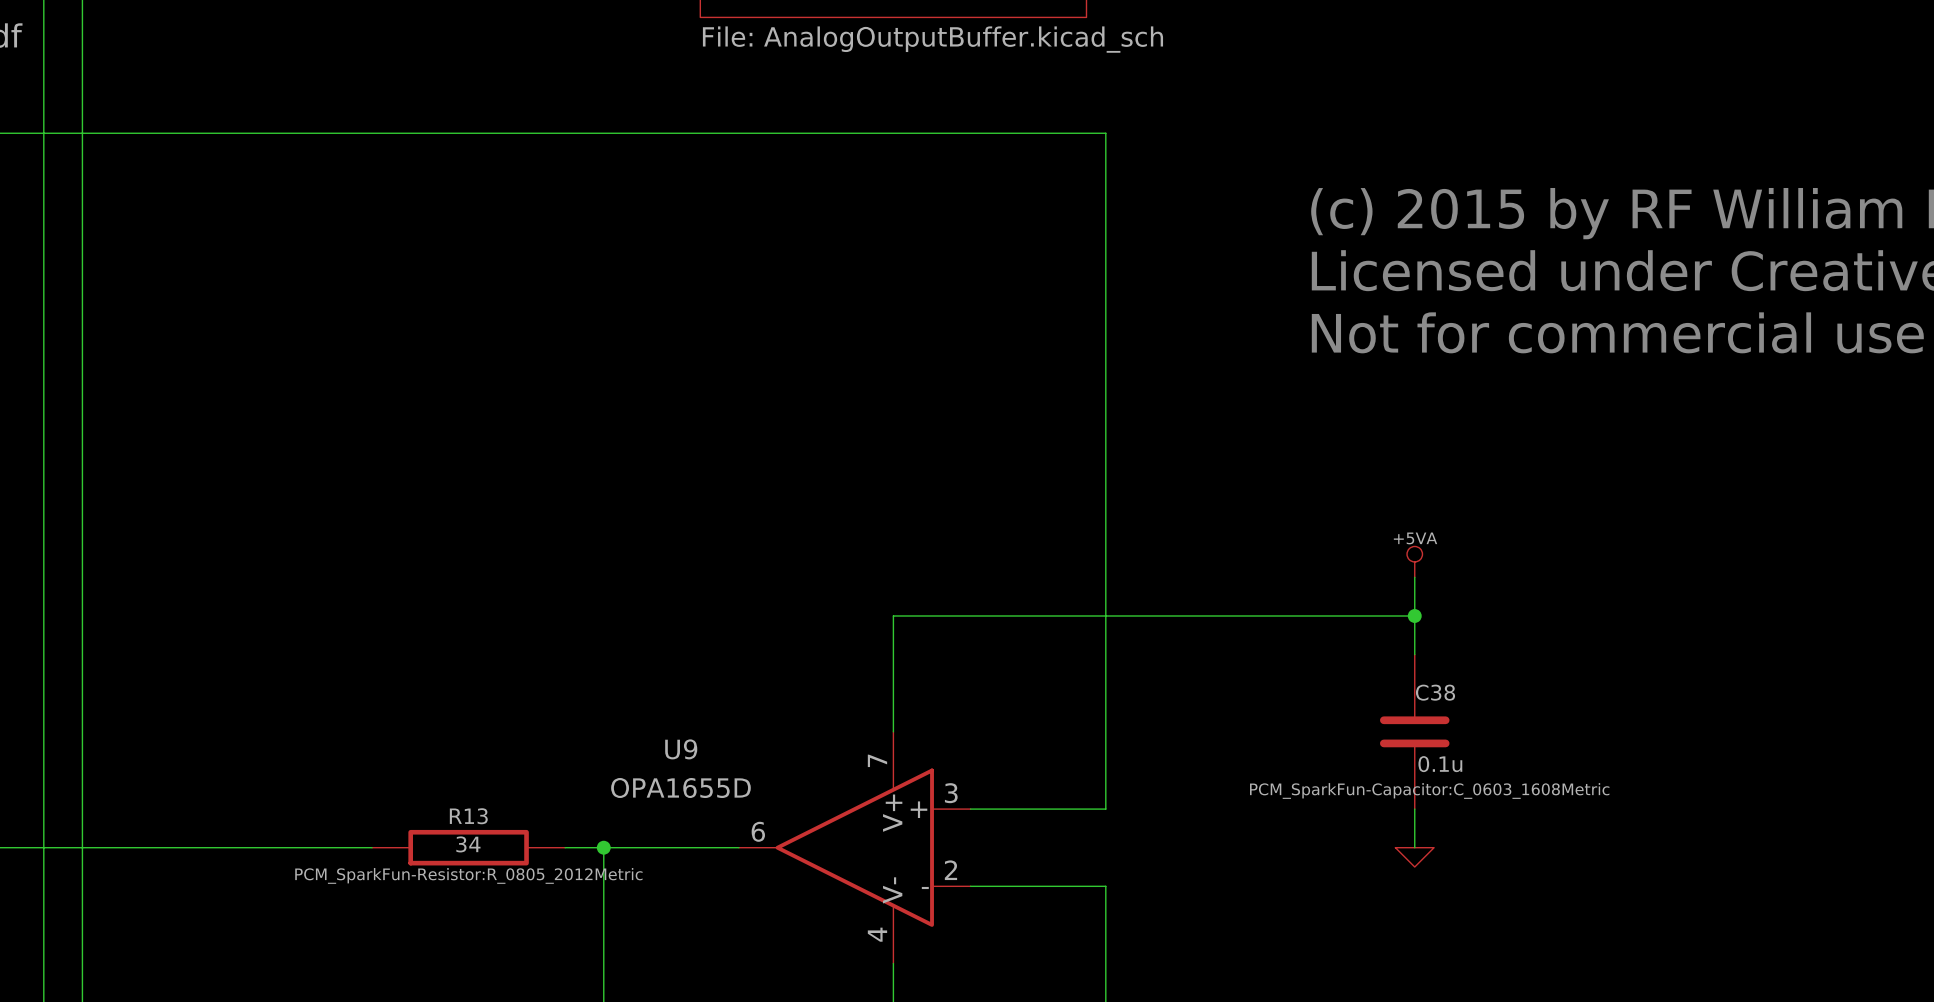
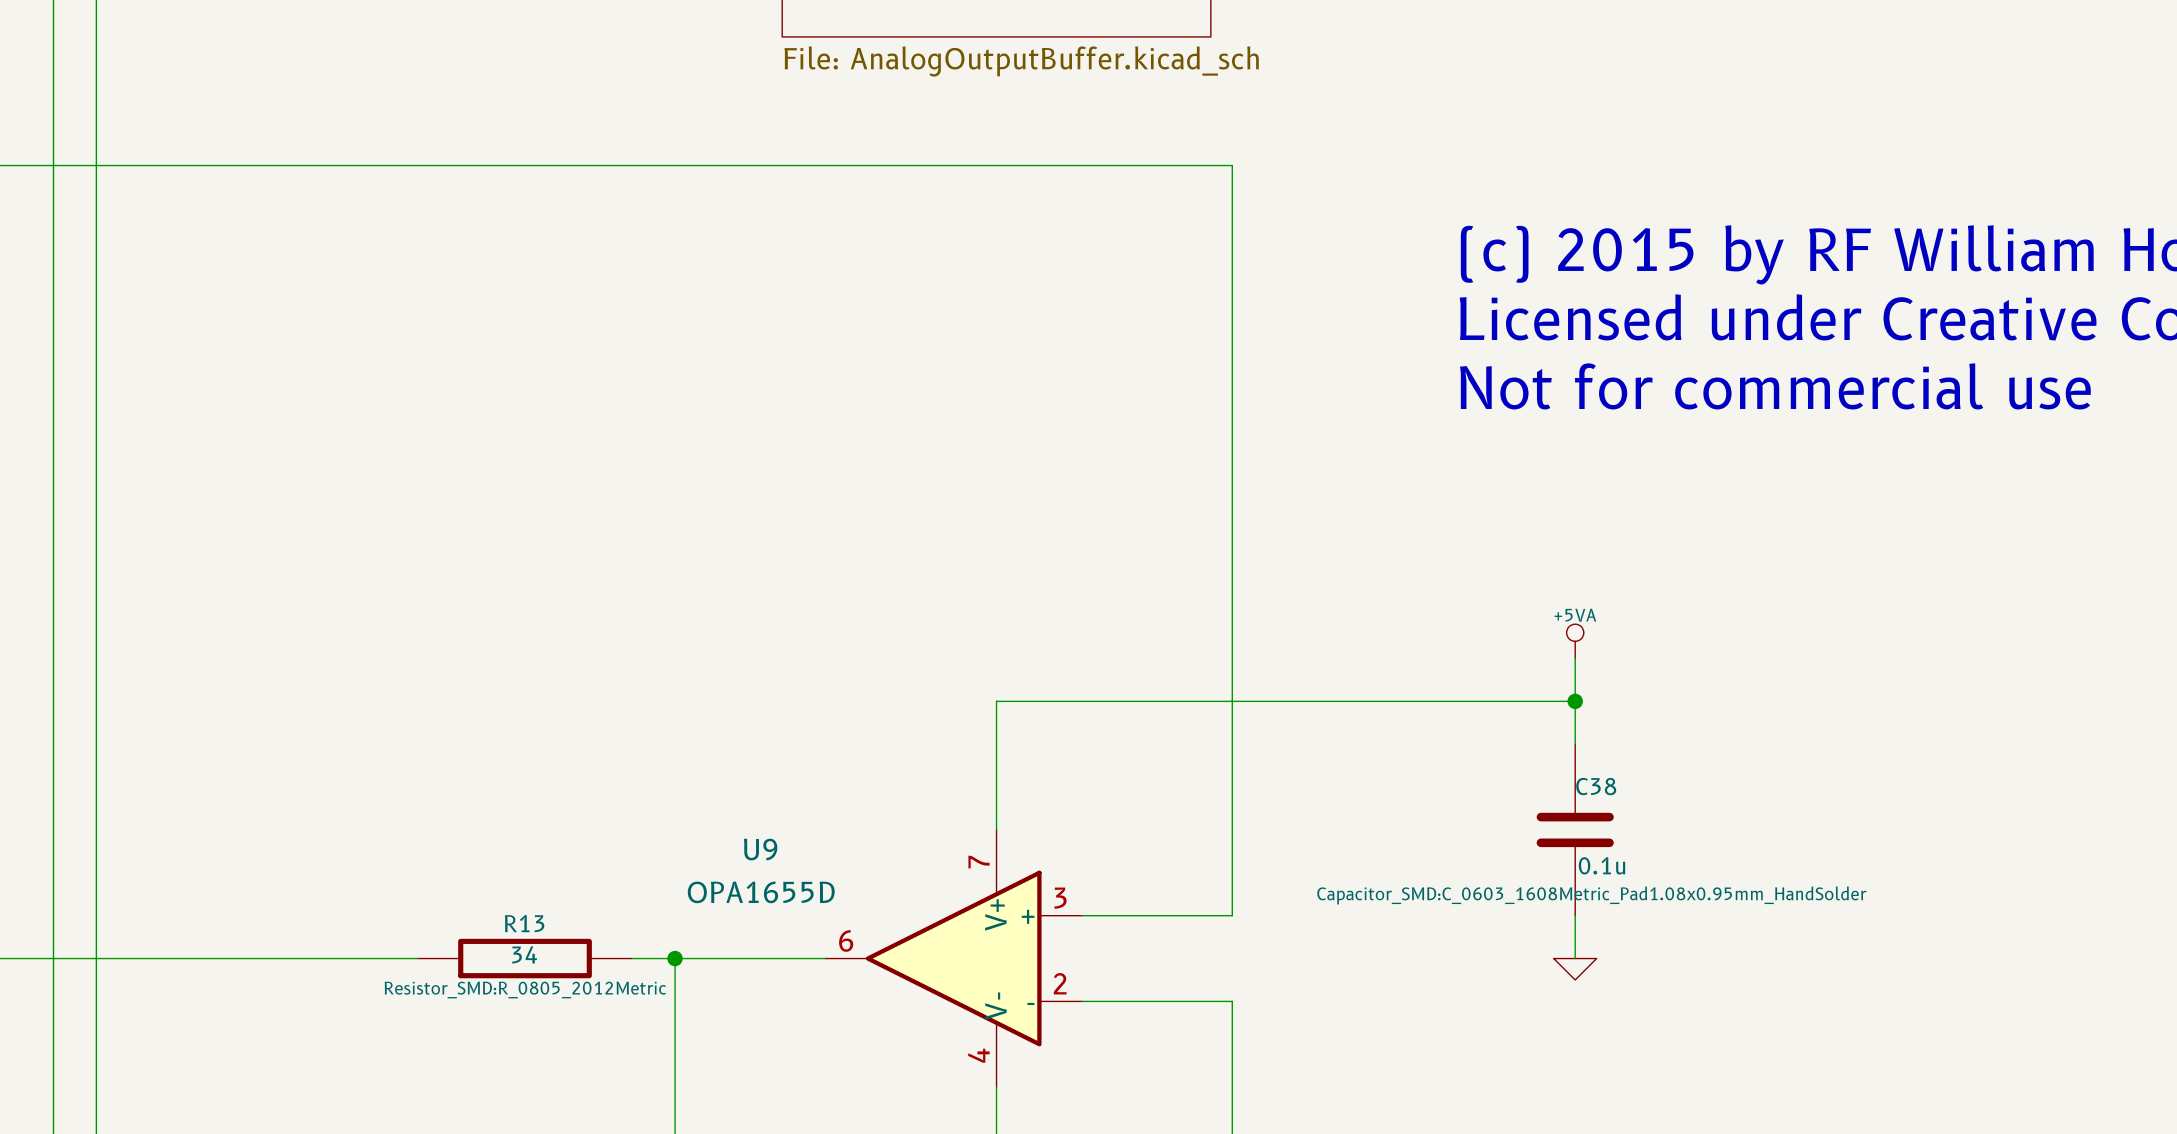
C38 text: PCM_SparkFun-Capacitor:C_0603_1608Metric (1429, 790) -> Capacitor_SMD:C_0603_1608Metric_Pad1.08x0.95mm_HandSolder (1591, 895)
R13 text: PCM_SparkFun-Resistor:R_0805_2012Metric (468, 875) -> Resistor_SMD:R_0805_2012Metric (525, 989)

